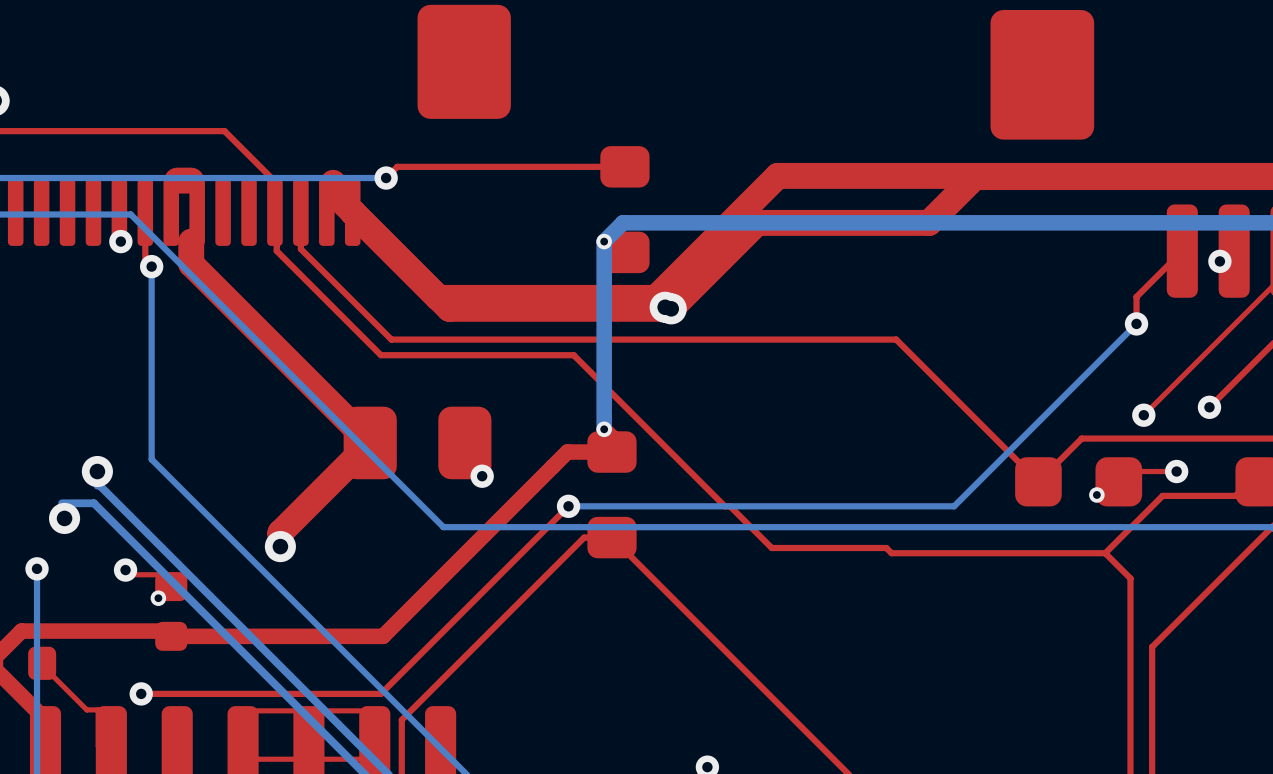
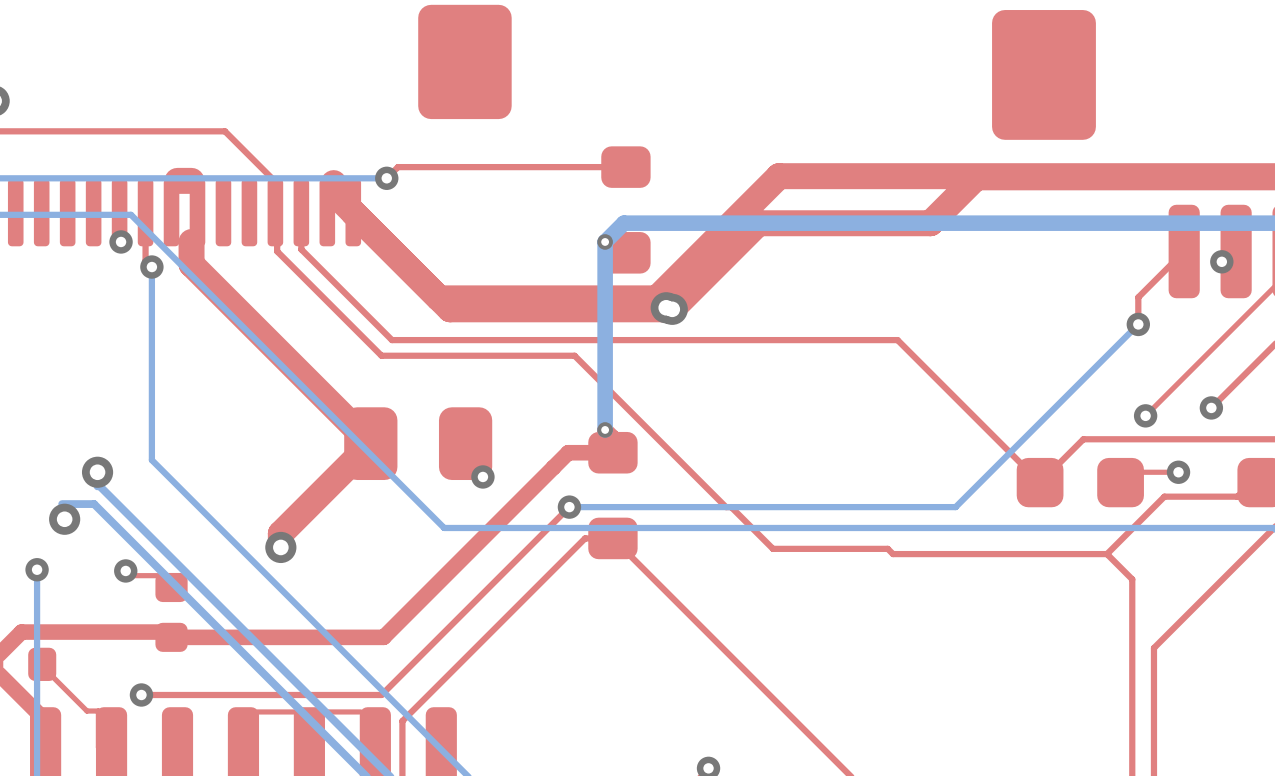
via: (1096, 494) -> none
via: (158, 598) -> none
top track: (374, 759) (243, 759) -> none

